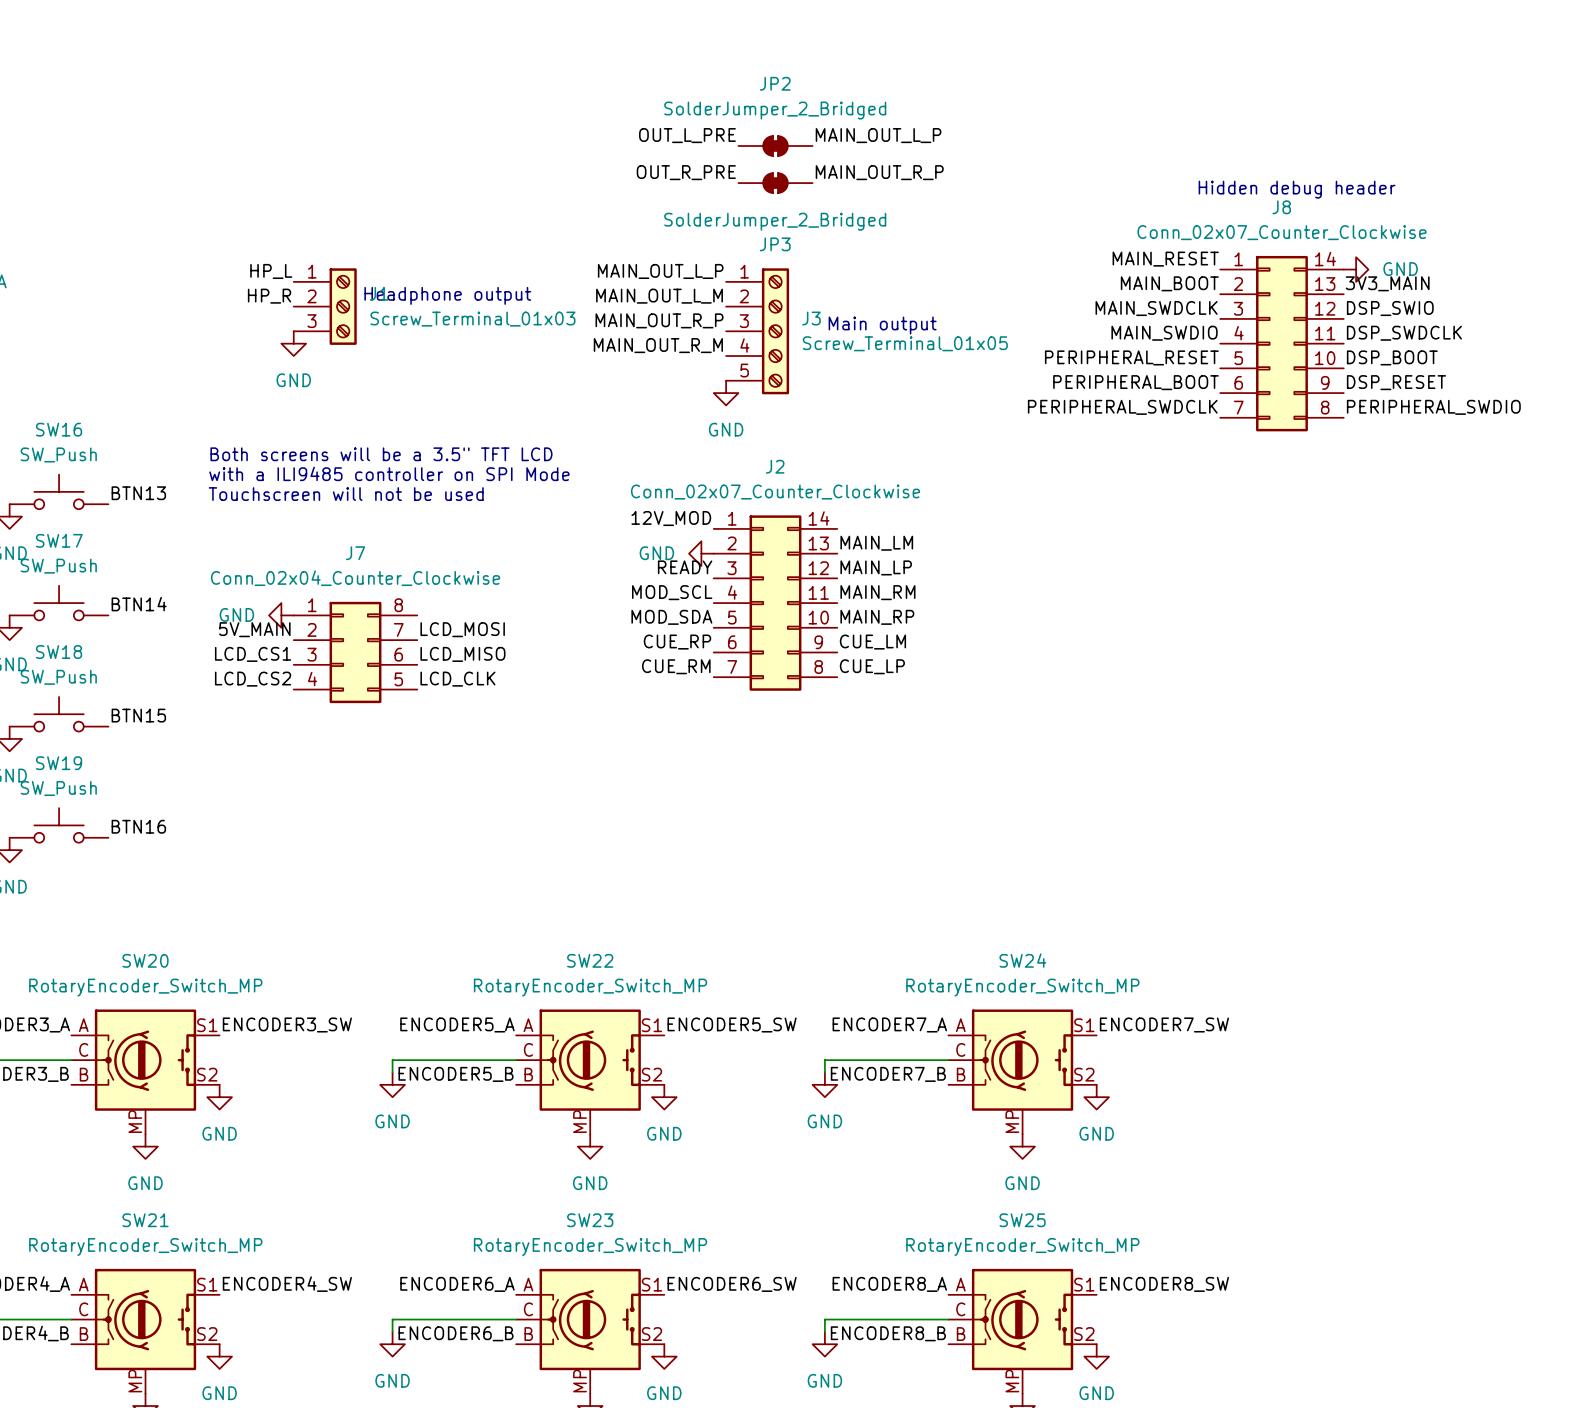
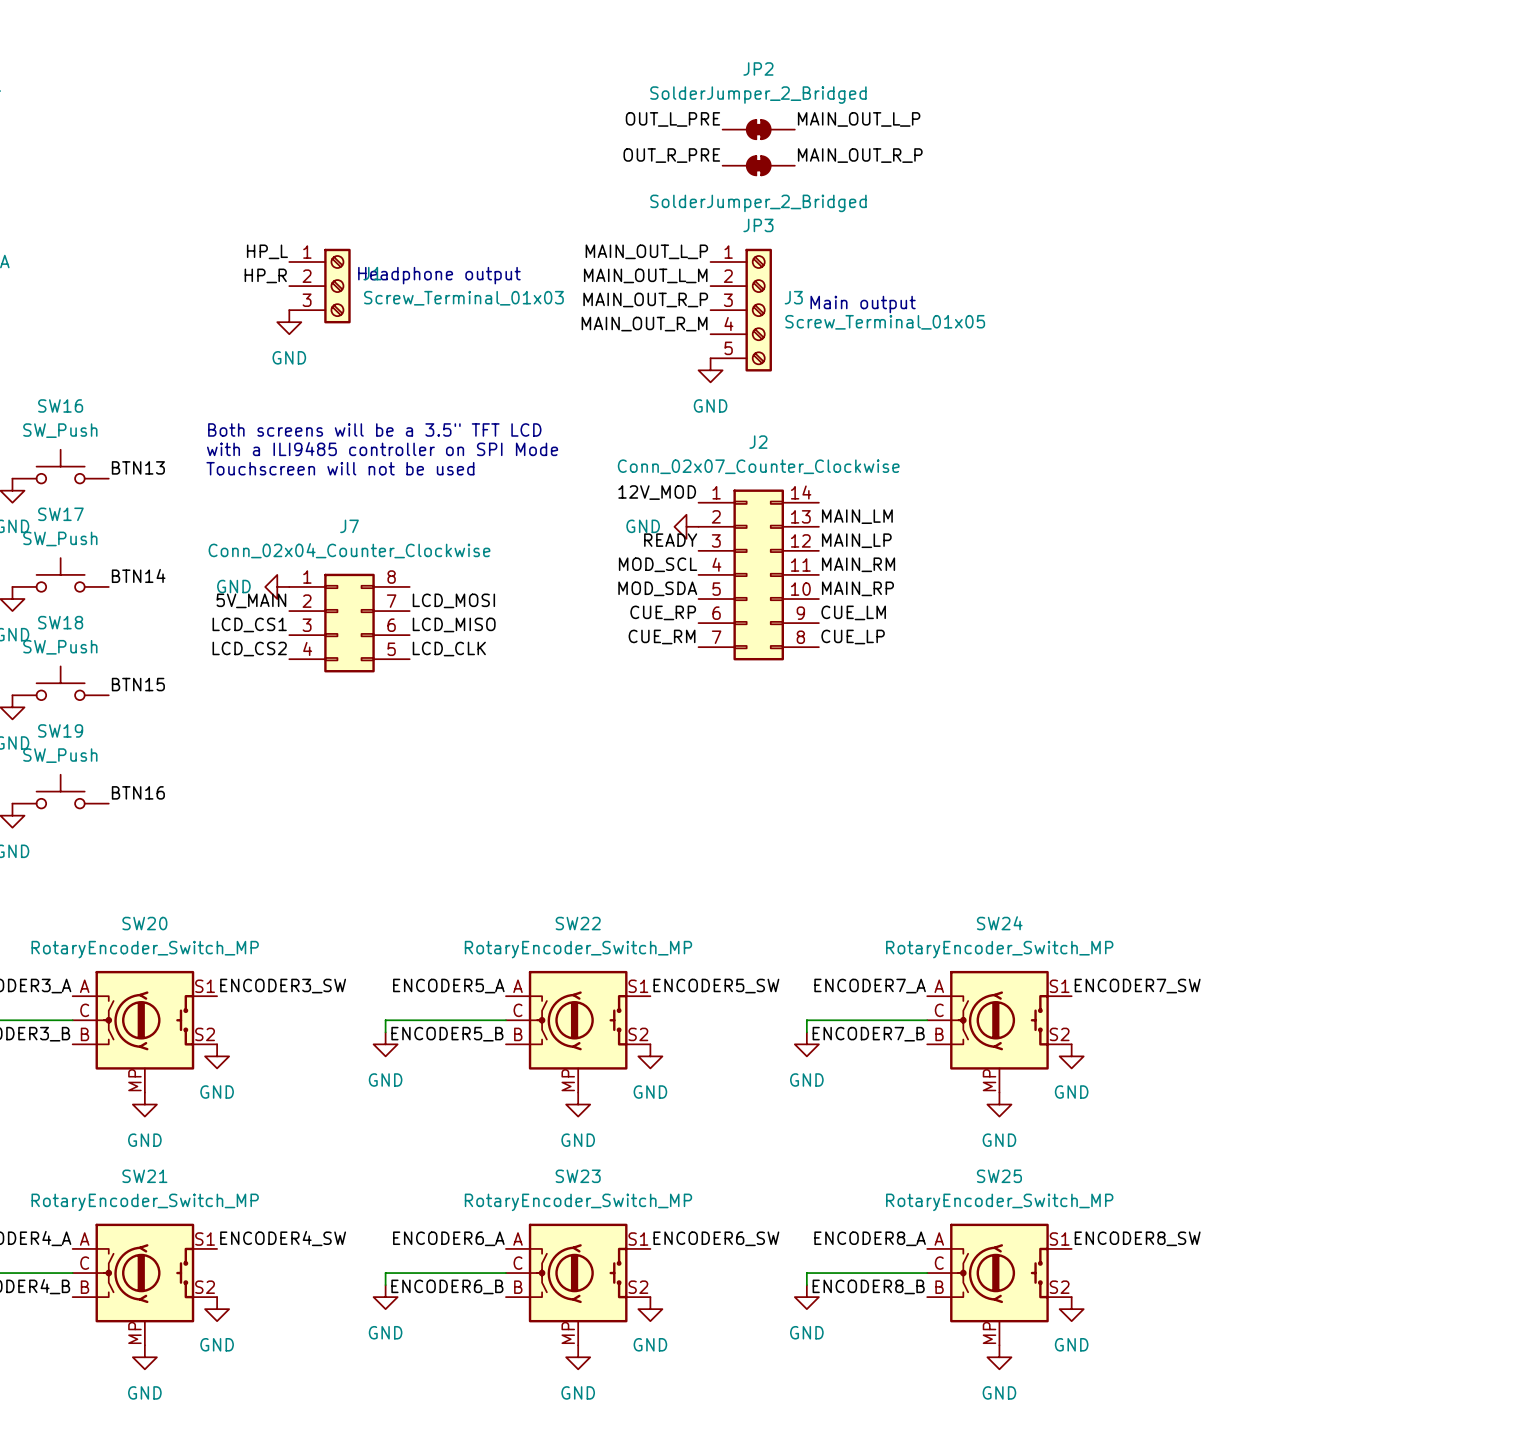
text: Hidden debug header (1297, 189) -> none
label: MAIN_RESET (1165, 259) -> none
power symbol: GND (1356, 269) -> none
label: MAIN_BOOT (1169, 283) -> none
label: 3V3_MAIN (1387, 283) -> none
label: MAIN_SWDCLK (1156, 308) -> none
label: DSP_SWIO (1390, 308) -> none
label: MAIN_SWDIO (1164, 333) -> none
label: DSP_SWDCLK (1404, 333) -> none
J8: Conn_02x07_Counter_Clockwise (1281, 343) -> none
label: PERIPHERAL_RESET (1131, 357) -> none
label: DSP_BOOT (1392, 357) -> none
label: PERIPHERAL_BOOT (1136, 382) -> none
label: DSP_RESET (1396, 382) -> none
label: PERIPHERAL_SWDCLK (1122, 407) -> none
label: PERIPHERAL_SWDIO (1433, 407) -> none

